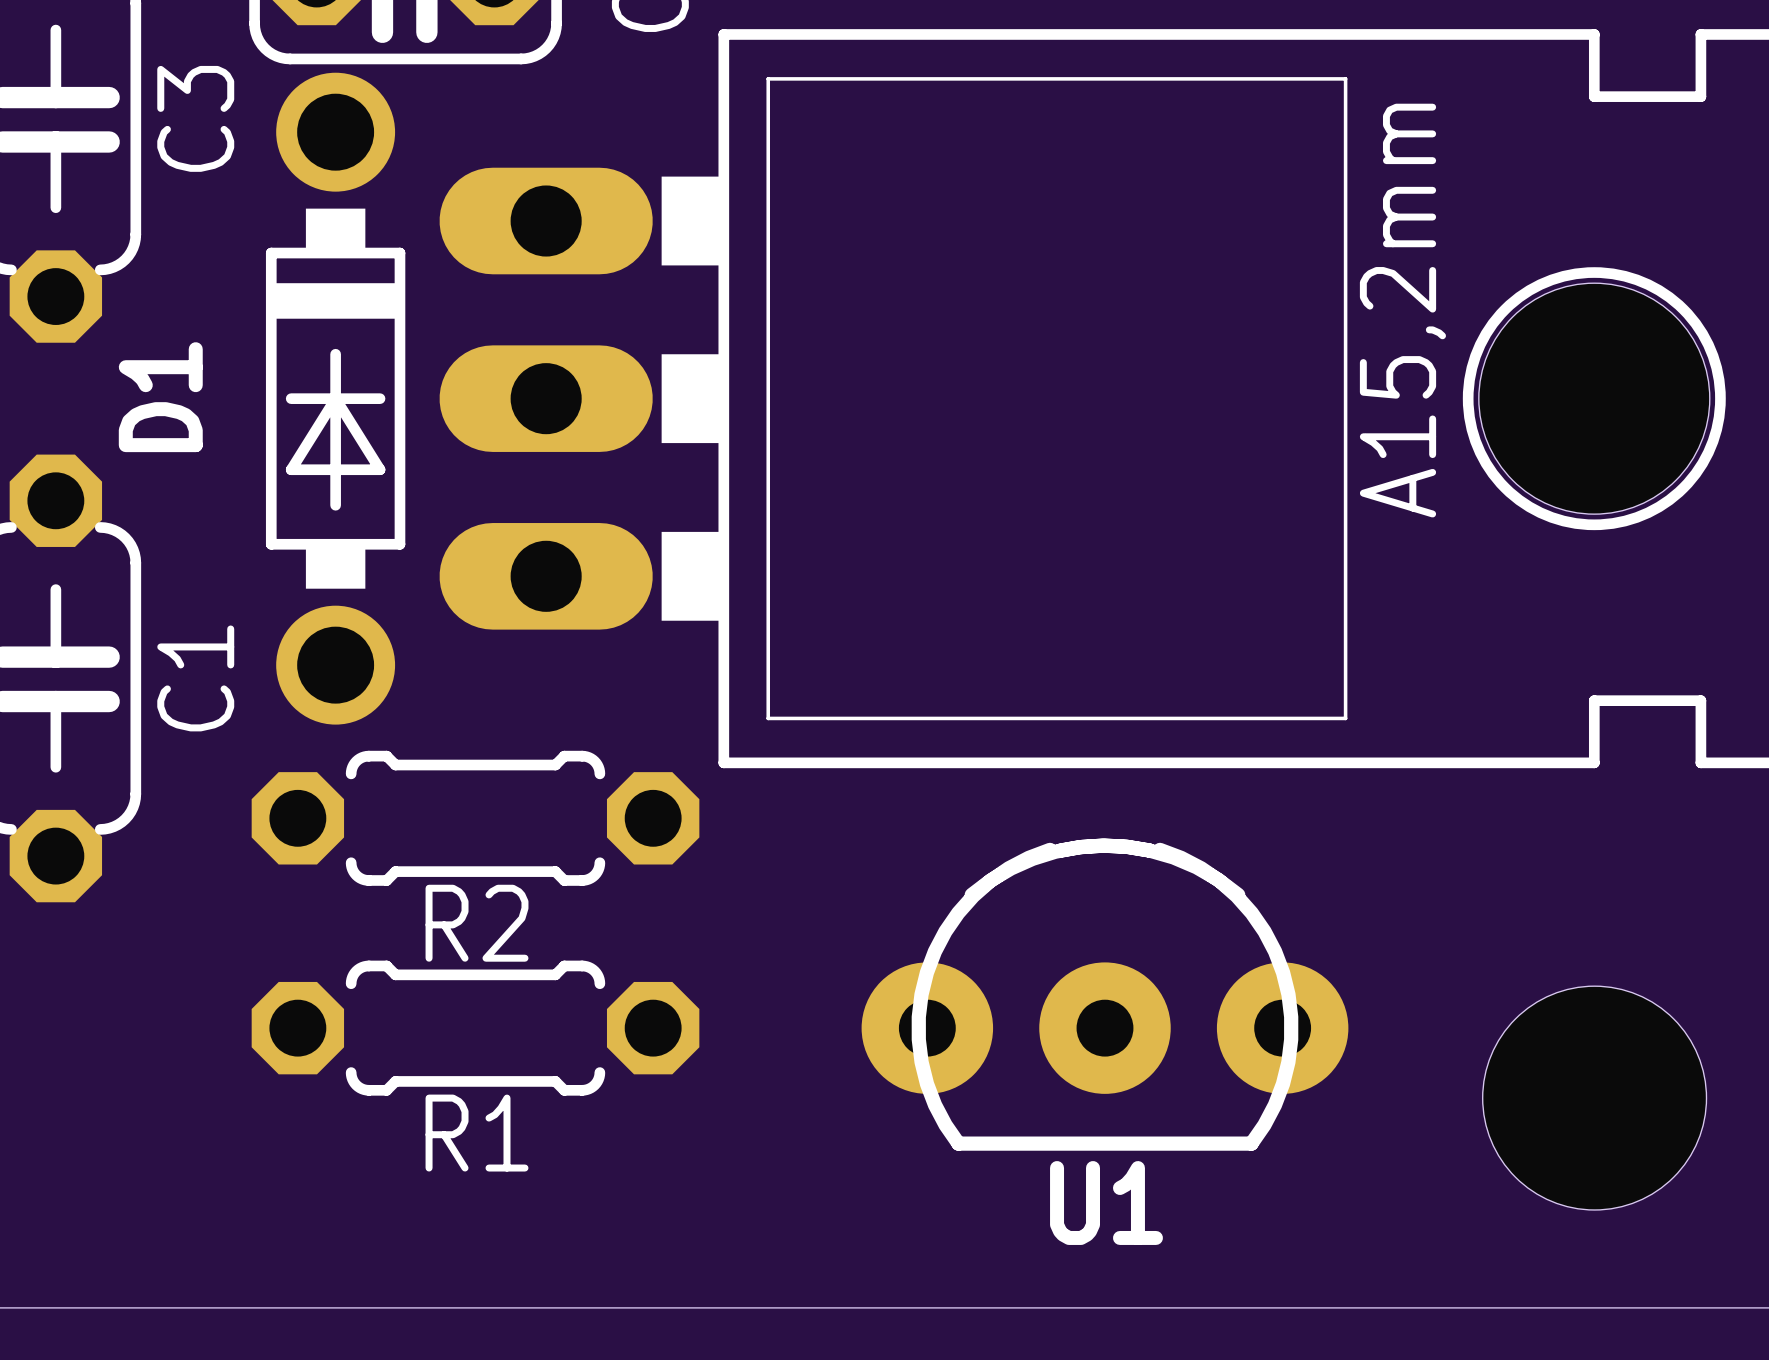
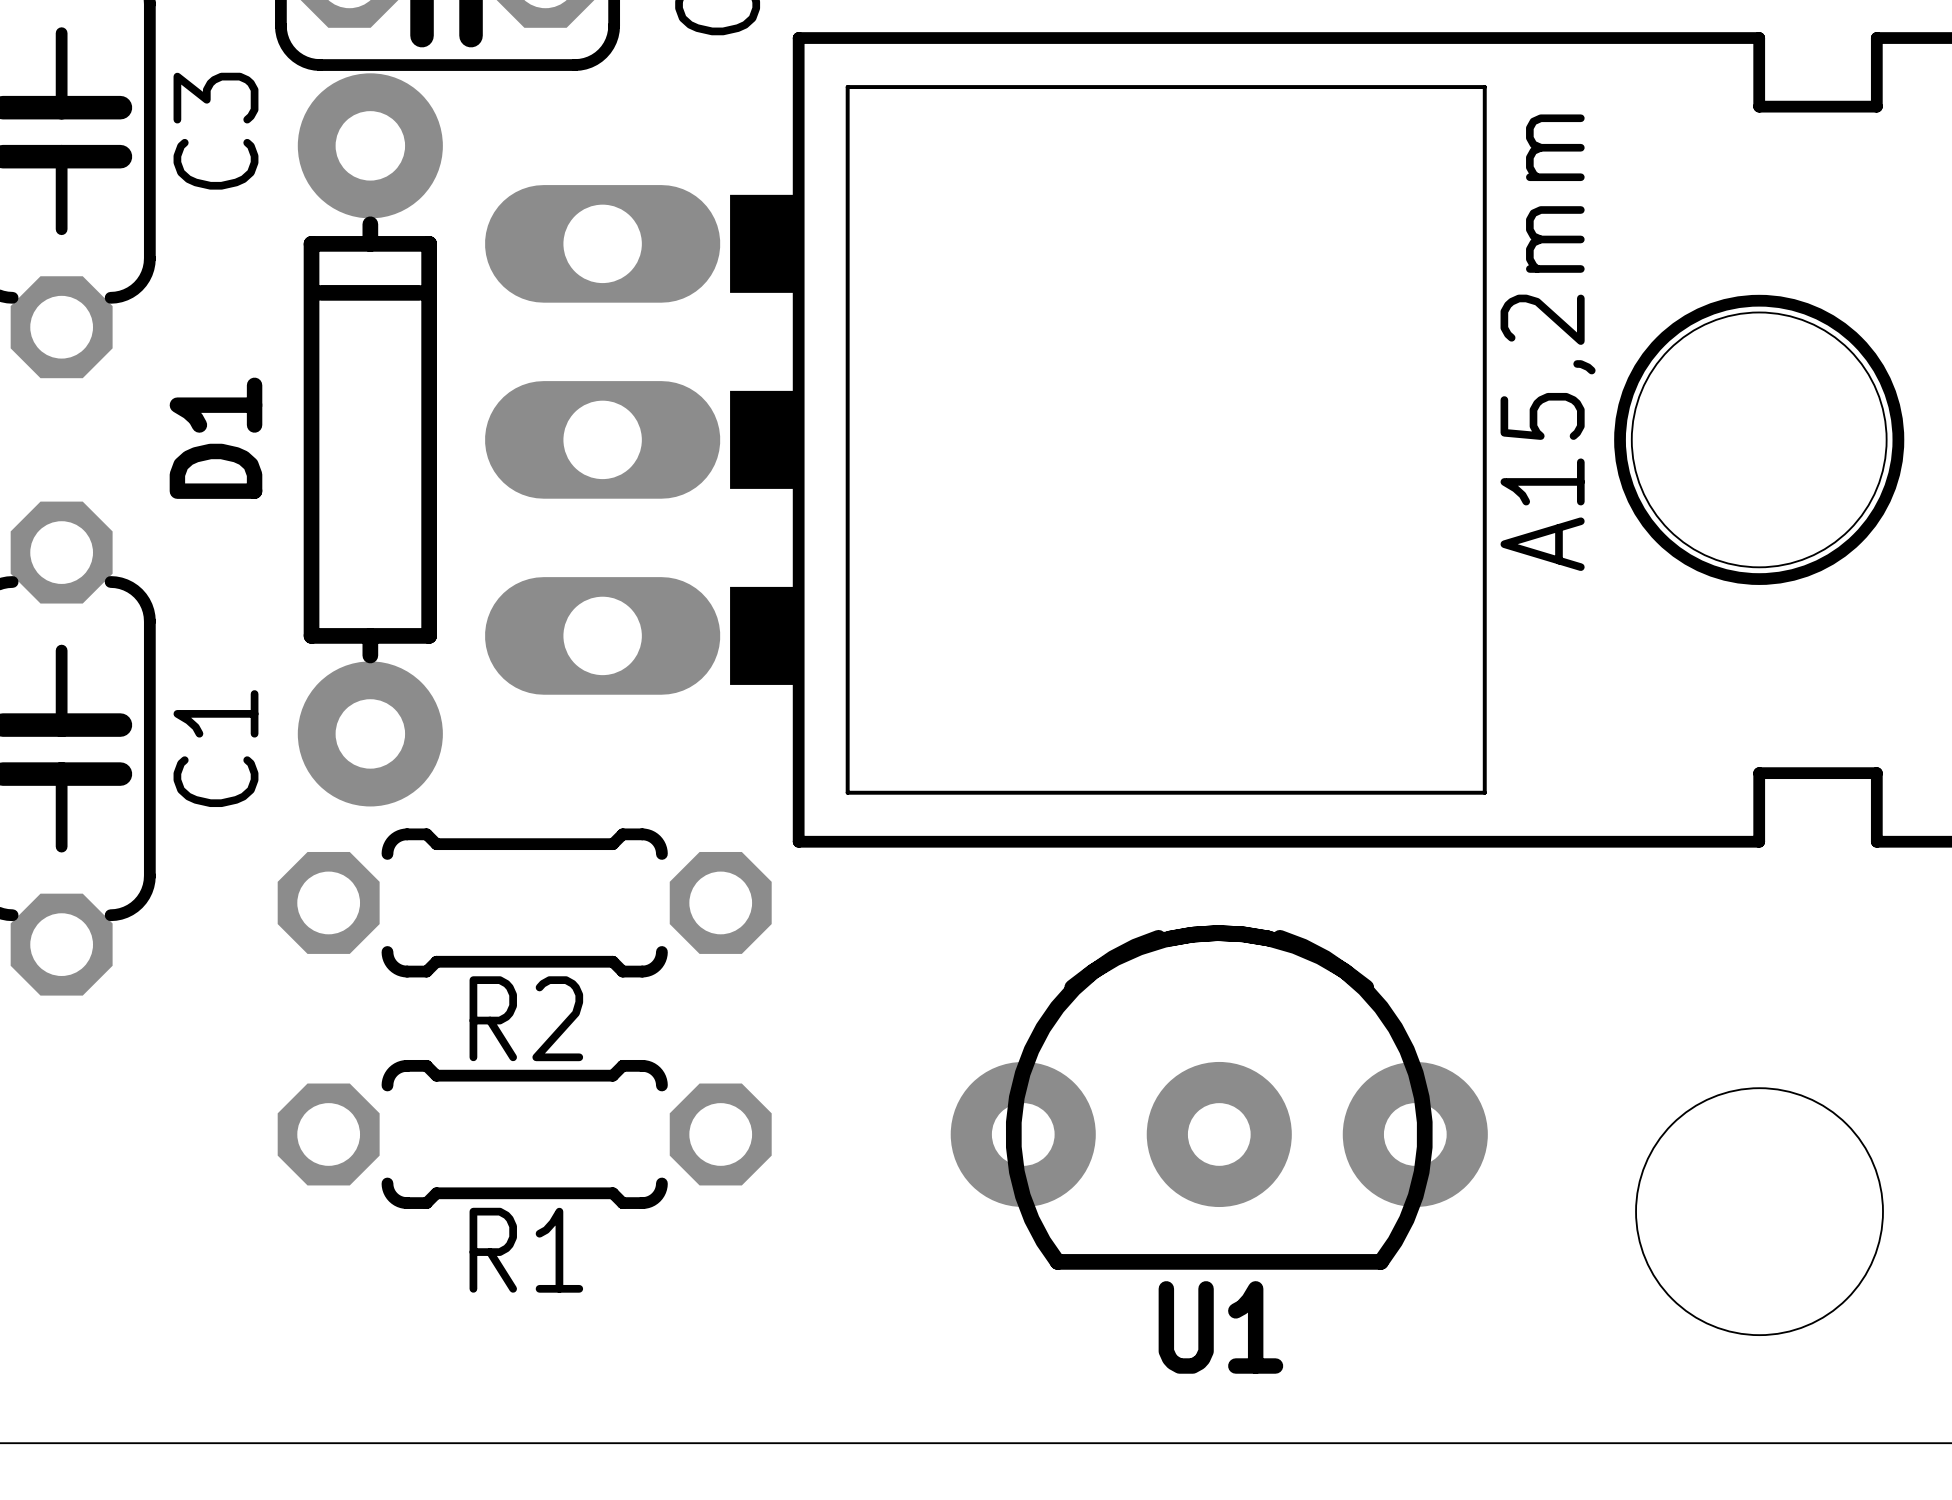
D1 footprint: [265, 72, 406, 725] -> [297, 73, 443, 807]
D1 name position: D1 (160, 397) -> D1 (215, 438)

